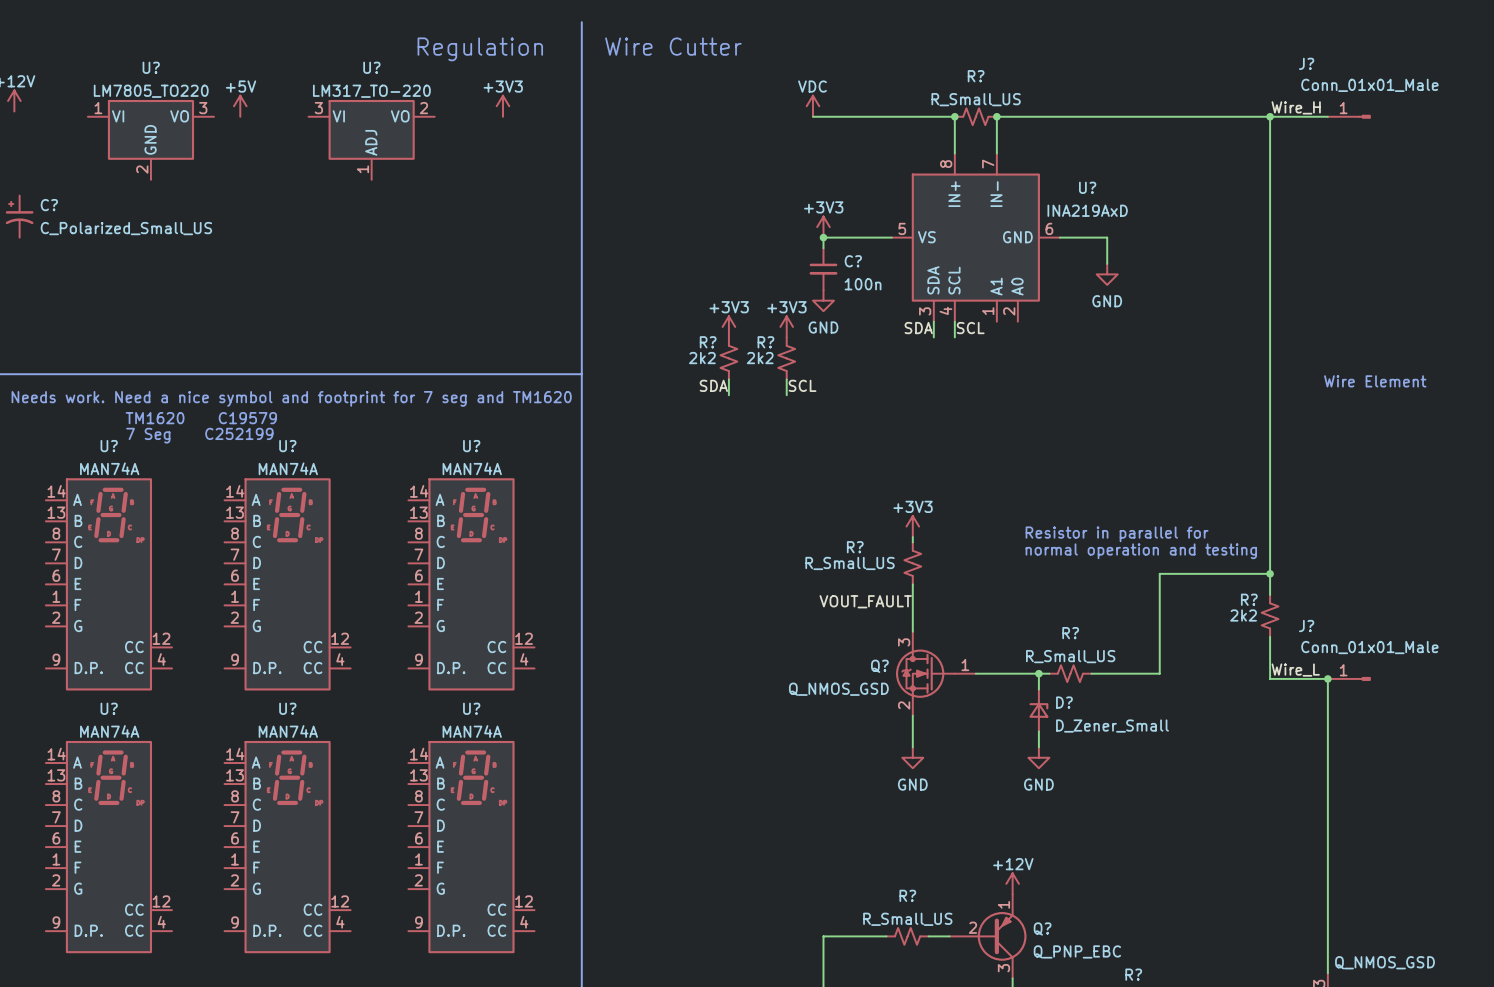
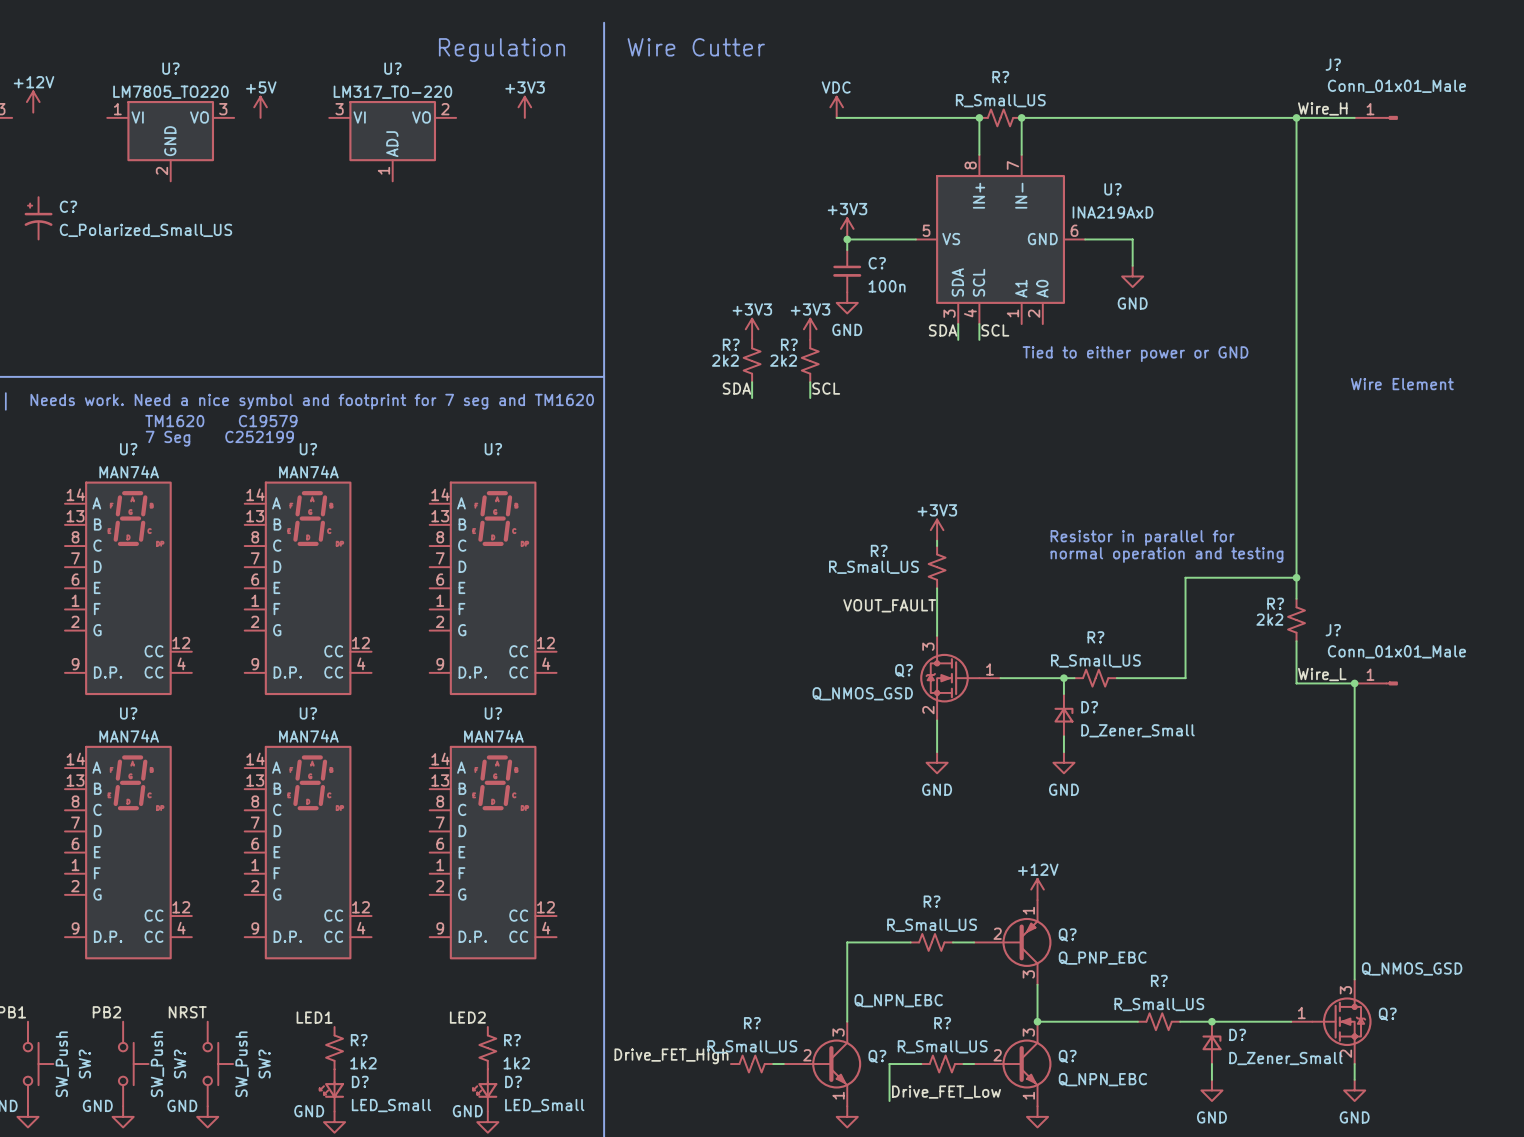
text: none -> Tied to either power or GND (1135, 354)
U? value: MAN74A (472, 468) -> none

